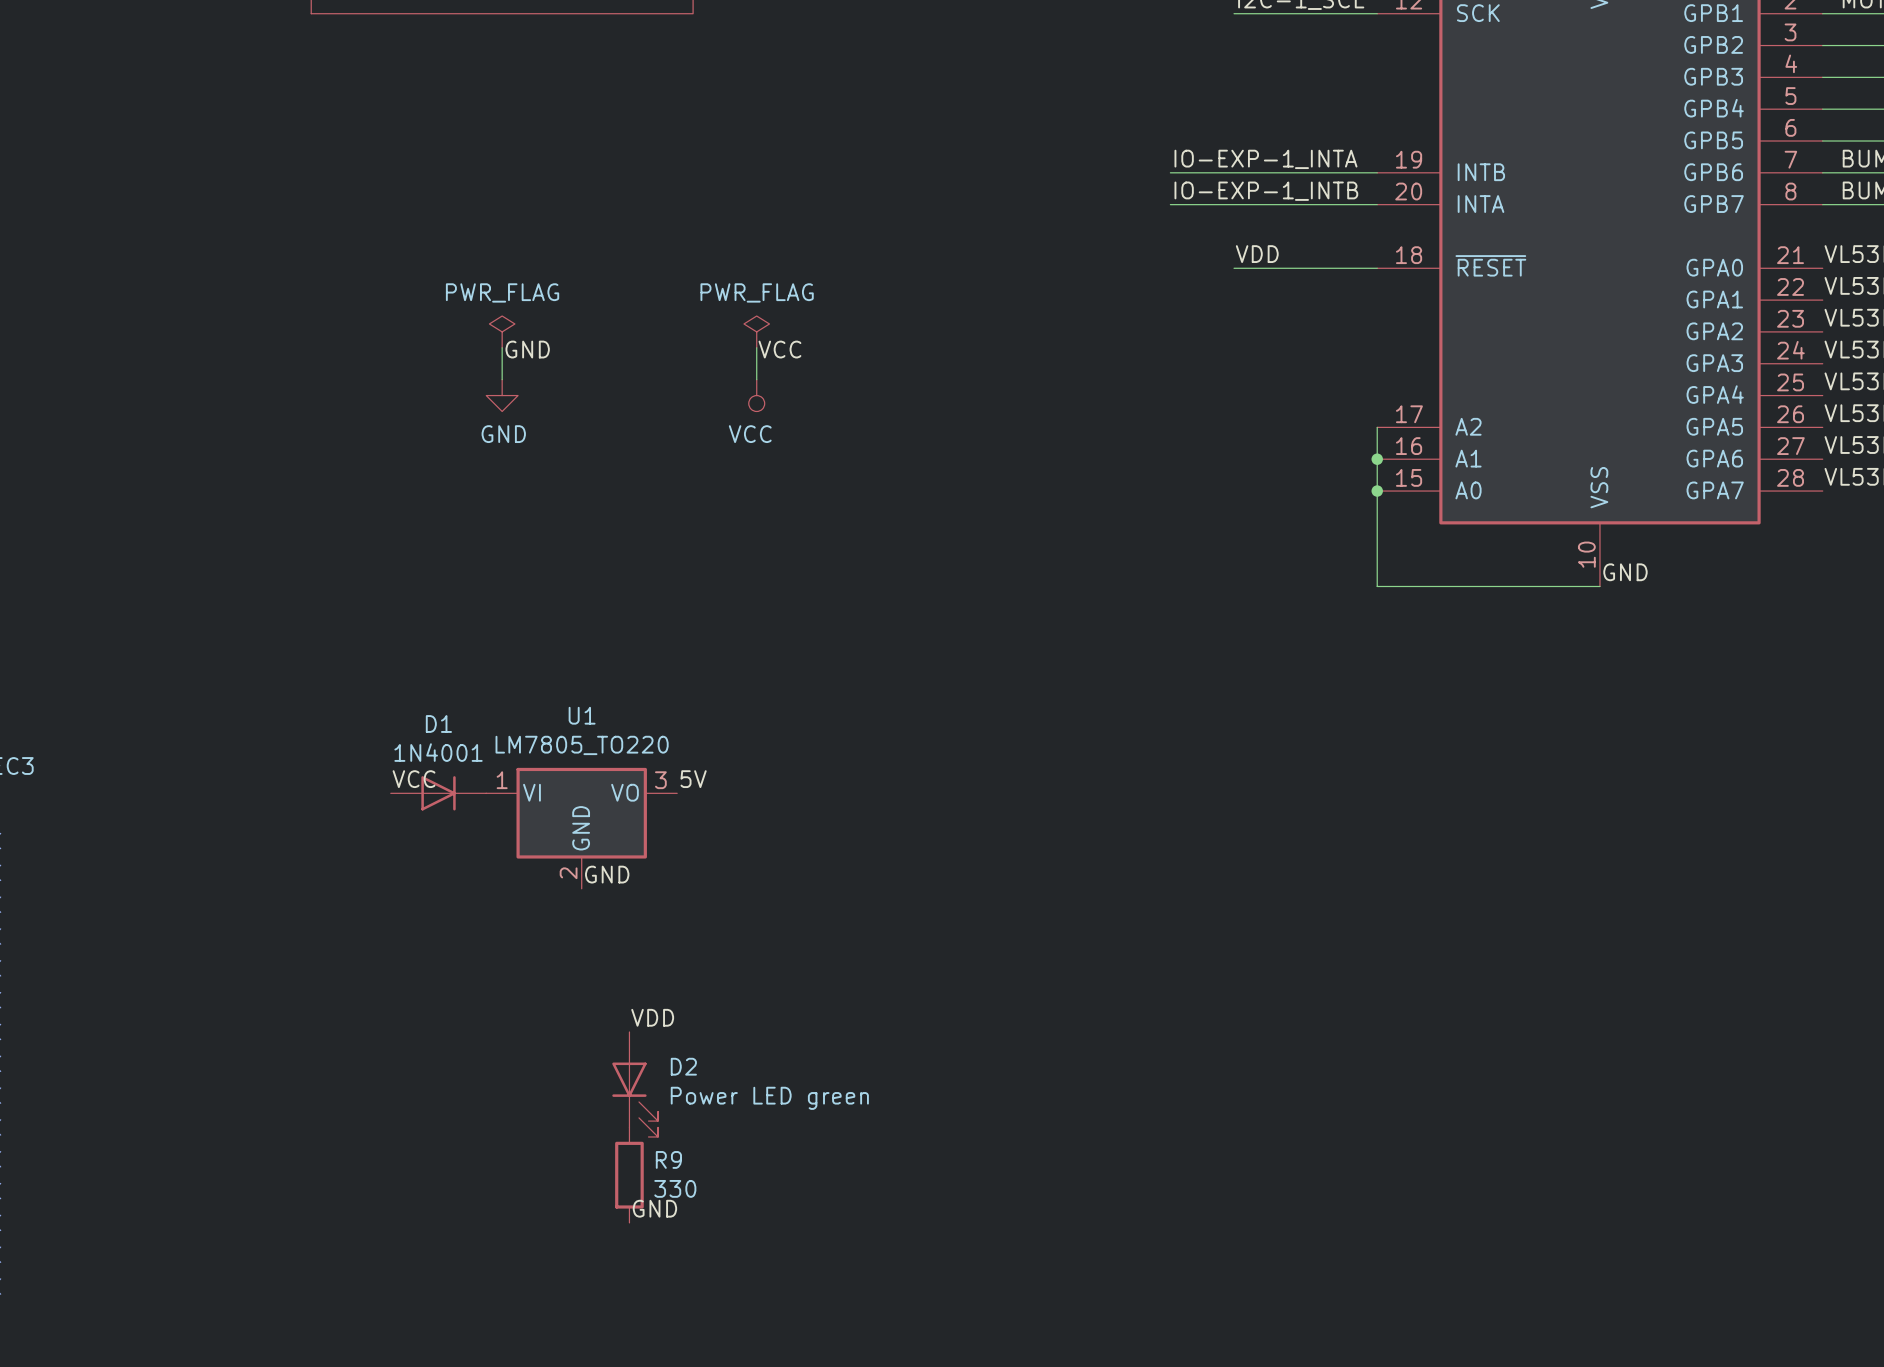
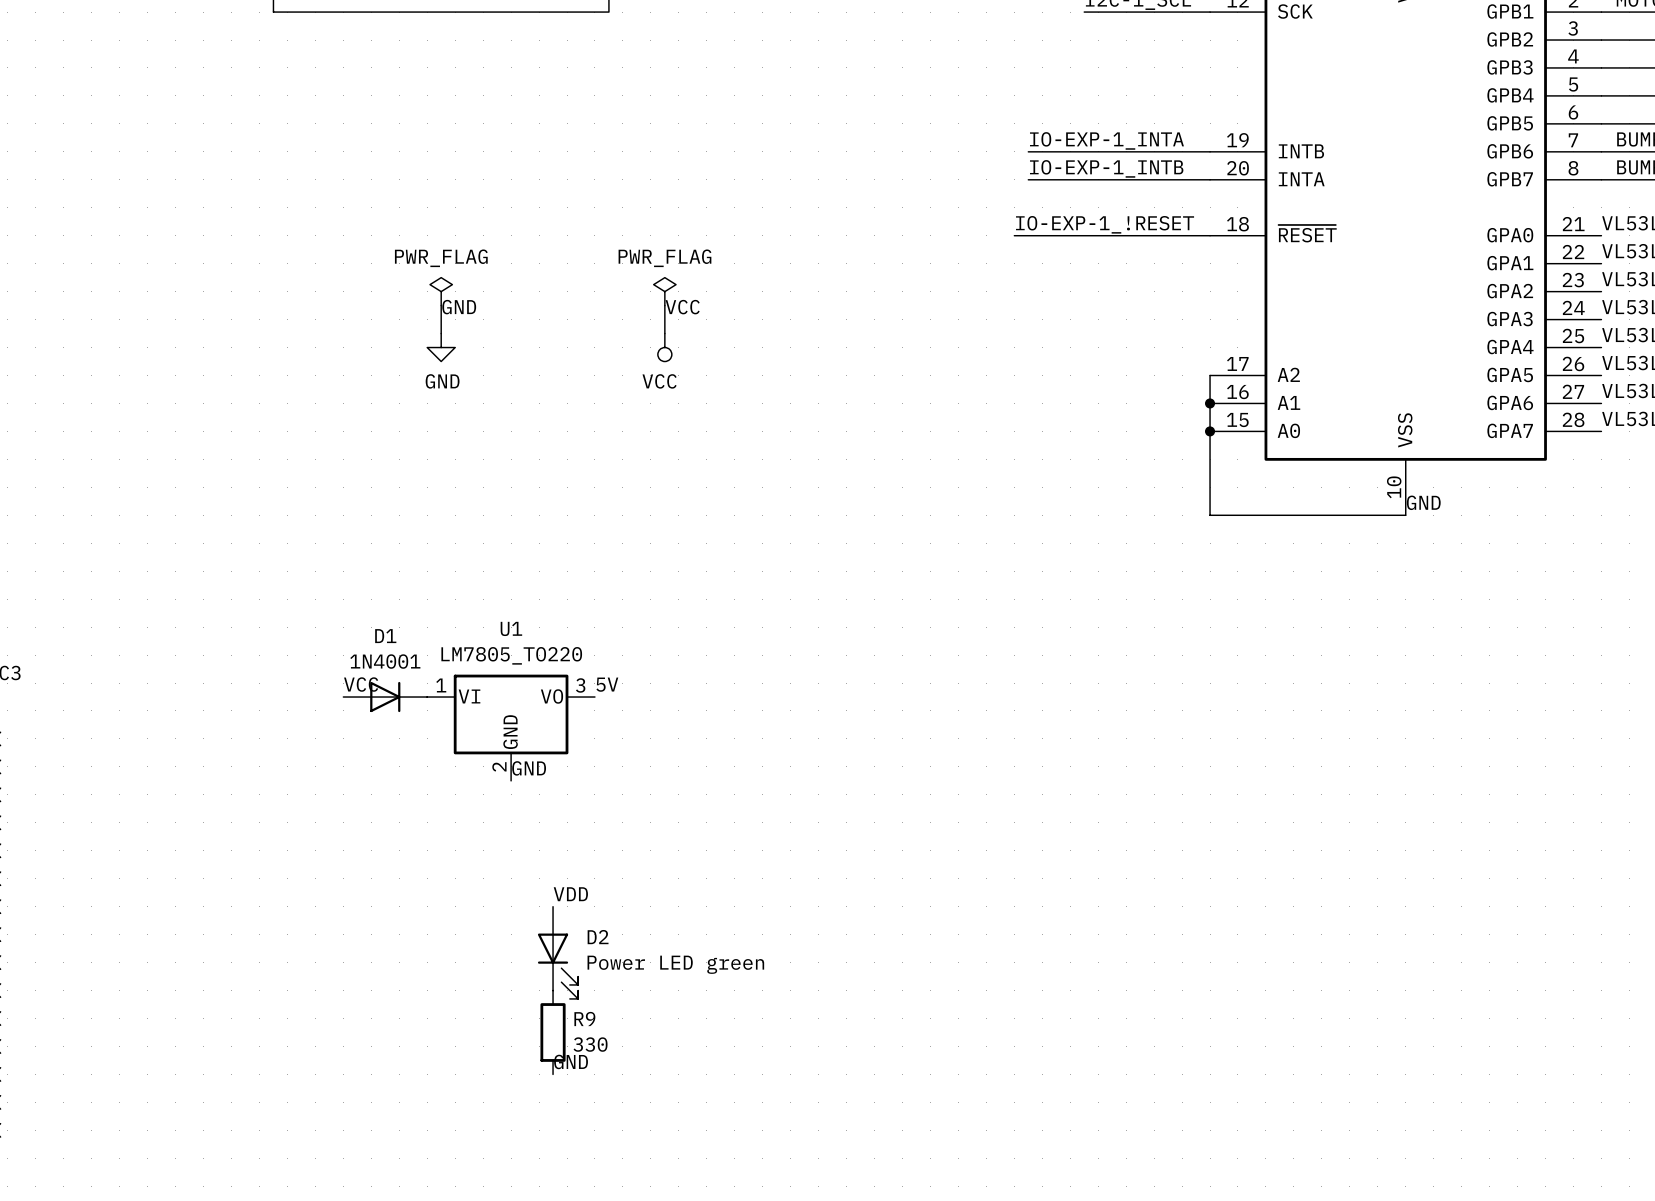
label: VDD (1257, 254) -> none
label: none -> IO-EXP-1_!RESET (1105, 224)
wire: none -> (1014, 235) (1084, 235)

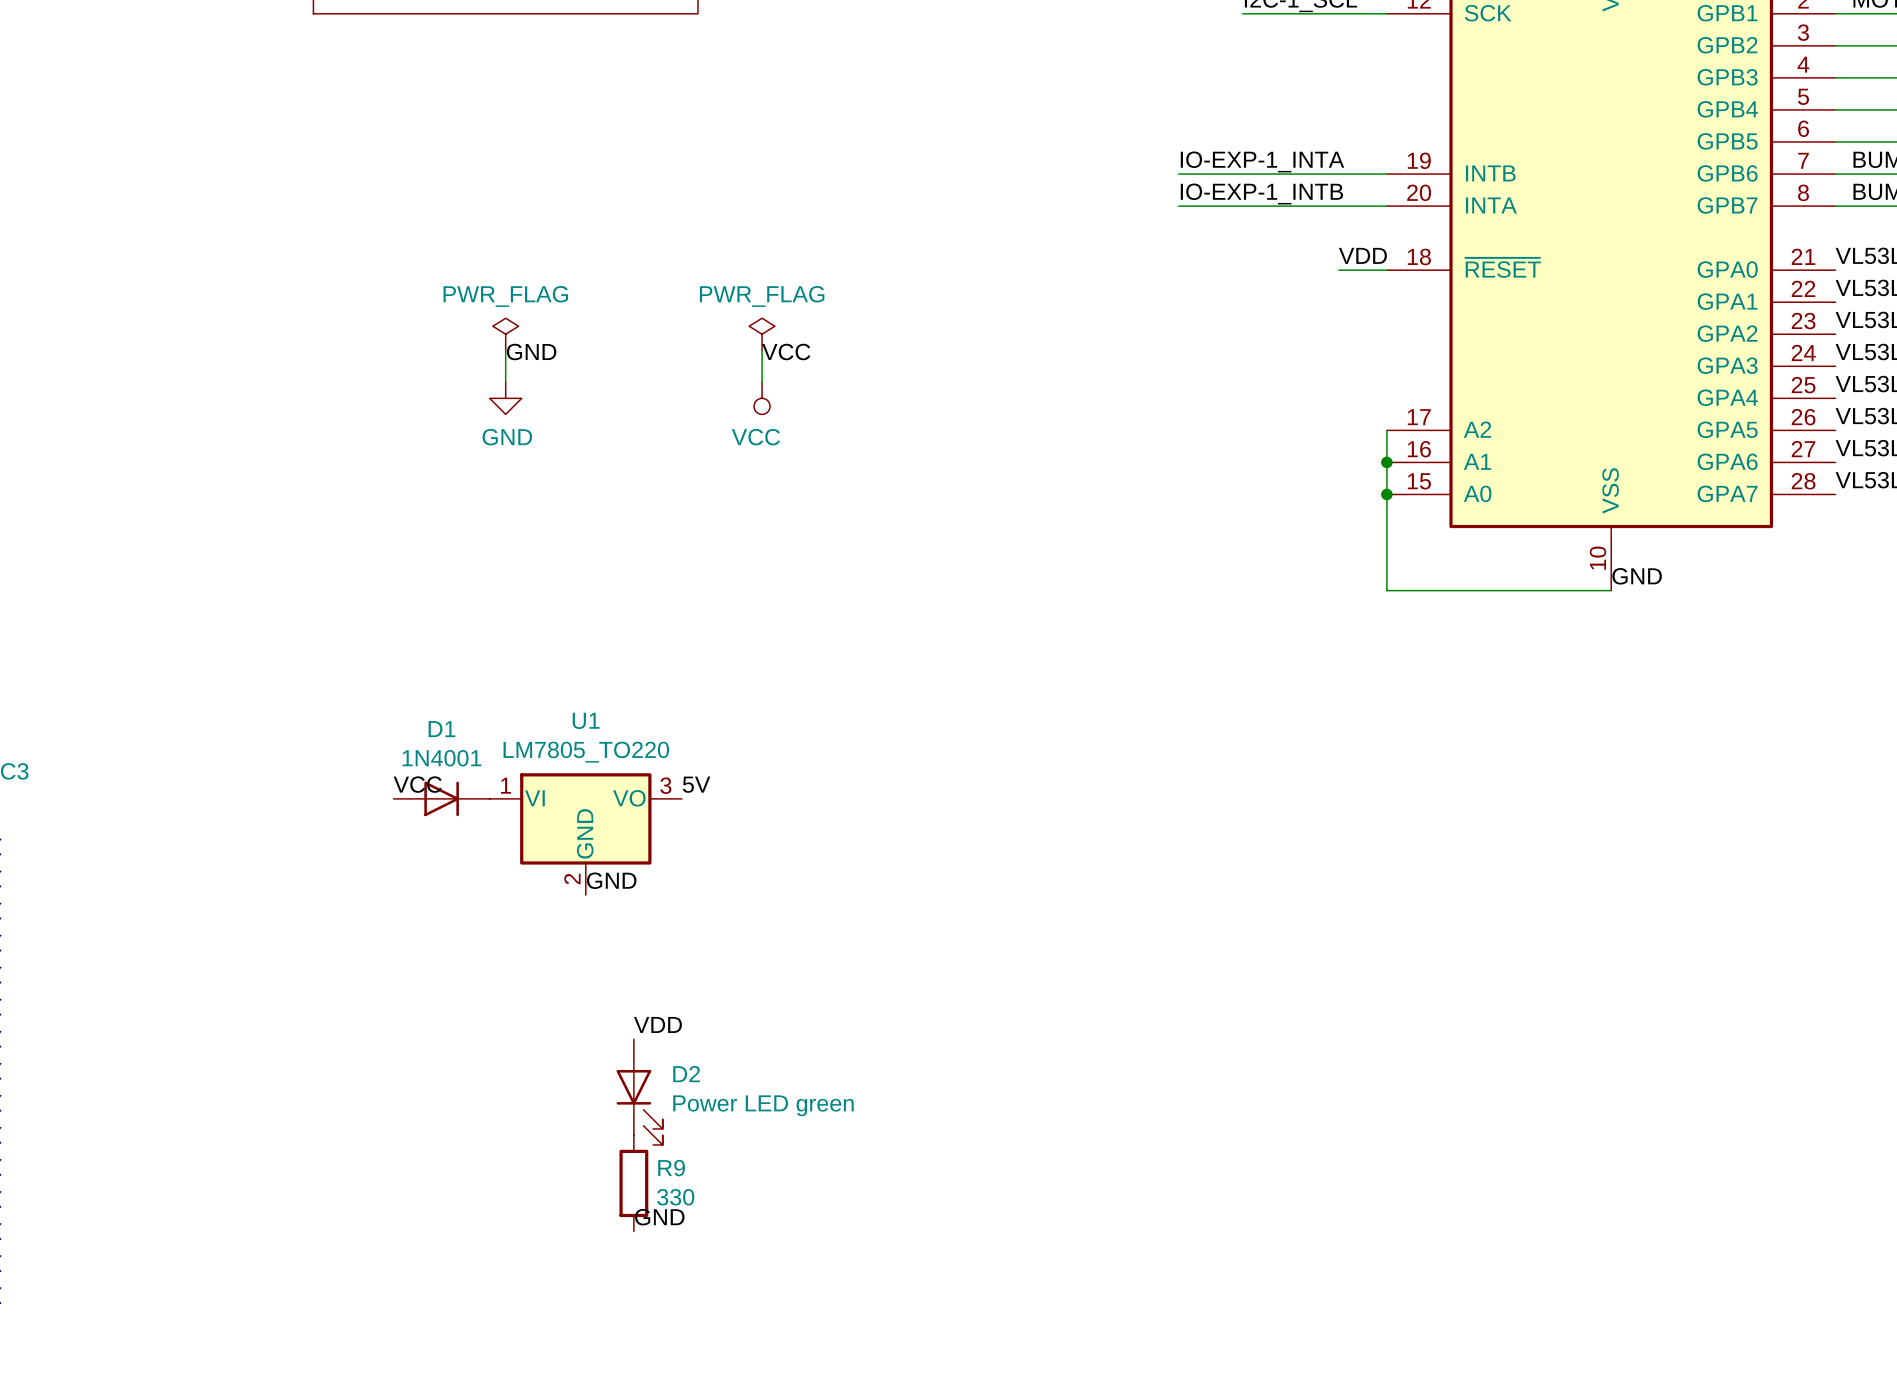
label: none -> VDD (1362, 255)
label: IO-EXP-1_!RESET (1105, 224) -> none
wire: (1014, 235) (1168, 235) -> none

